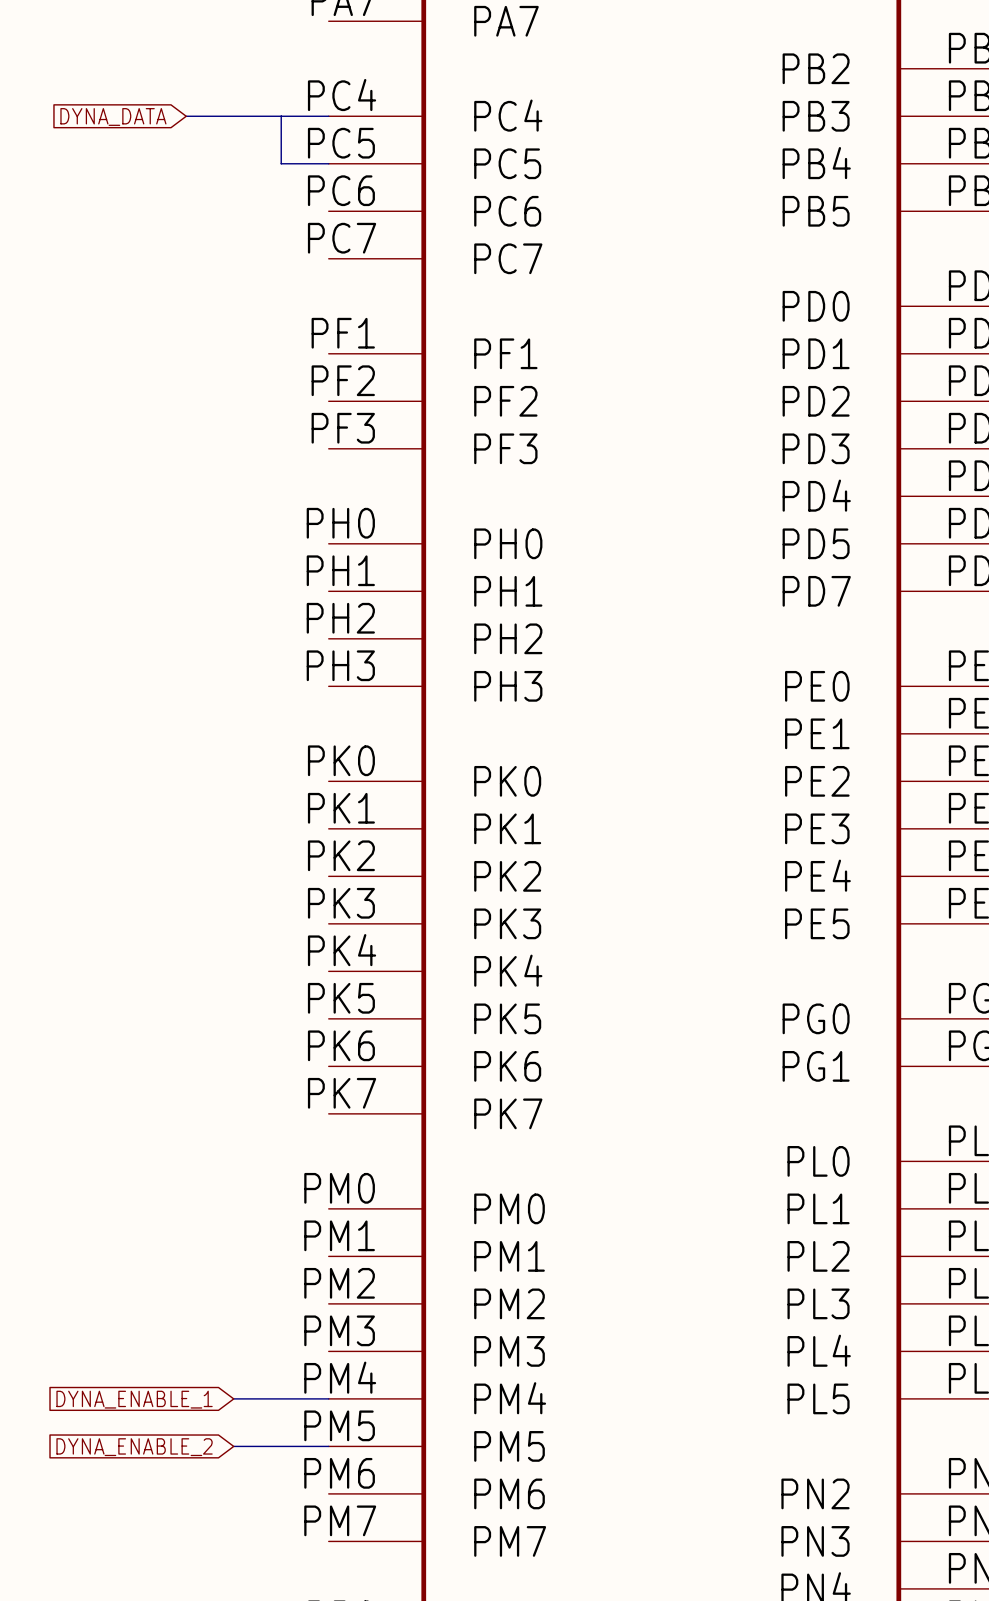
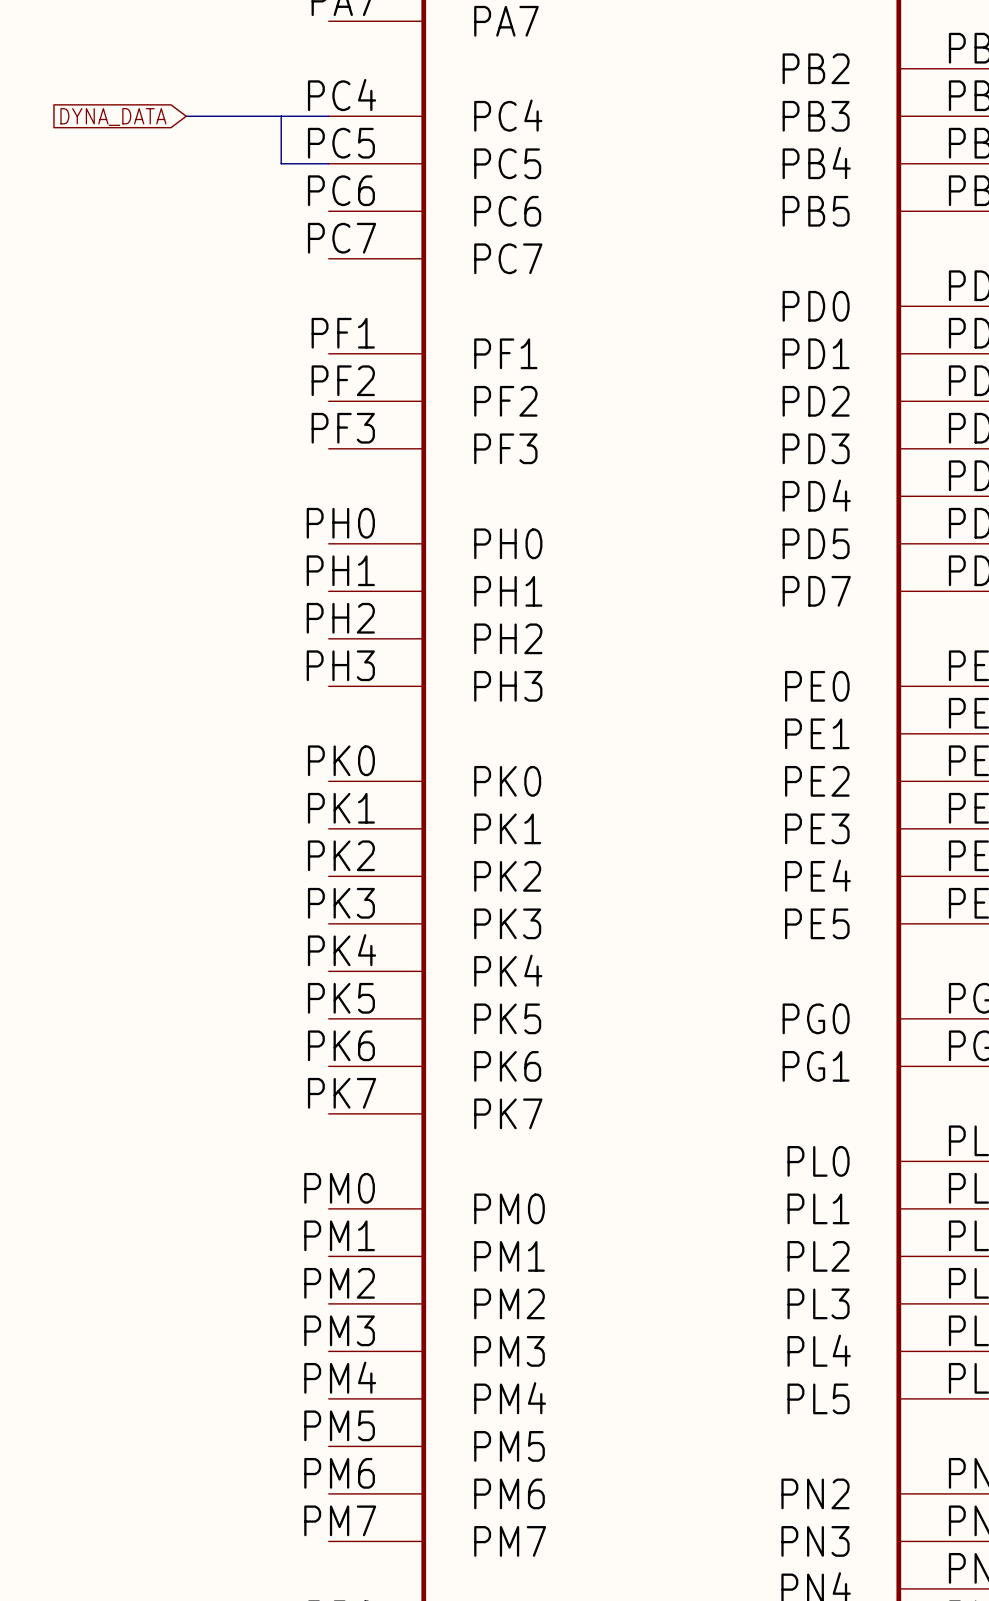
wire: (233, 1398) (328, 1398) -> none
global label: DYNA_ENABLE_1 (134, 1399) -> none
wire: (233, 1446) (328, 1446) -> none
global label: DYNA_ENABLE_2 (134, 1447) -> none

